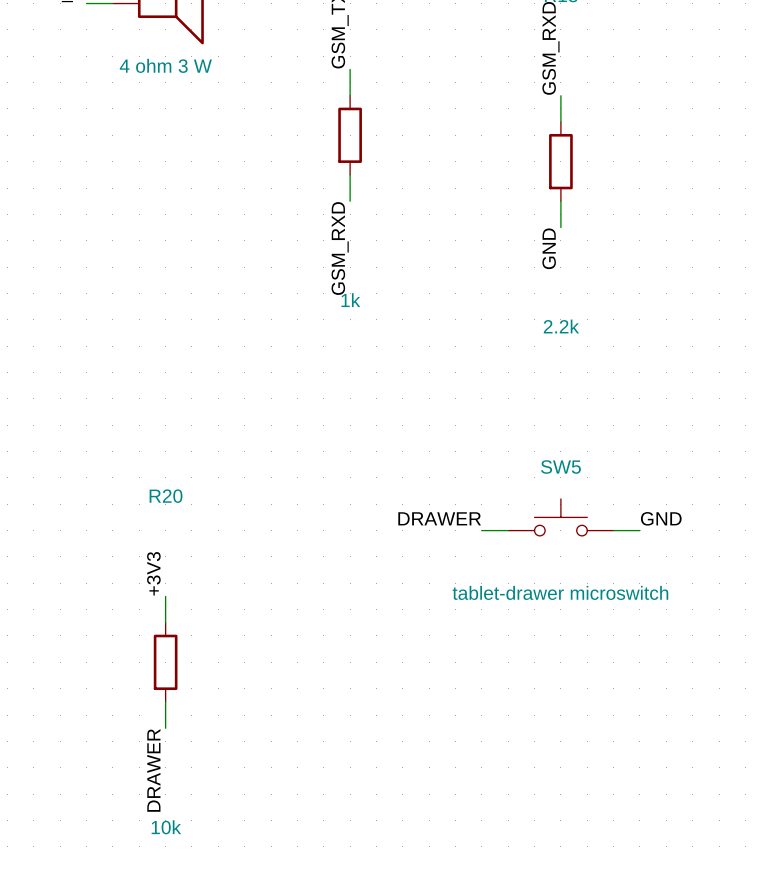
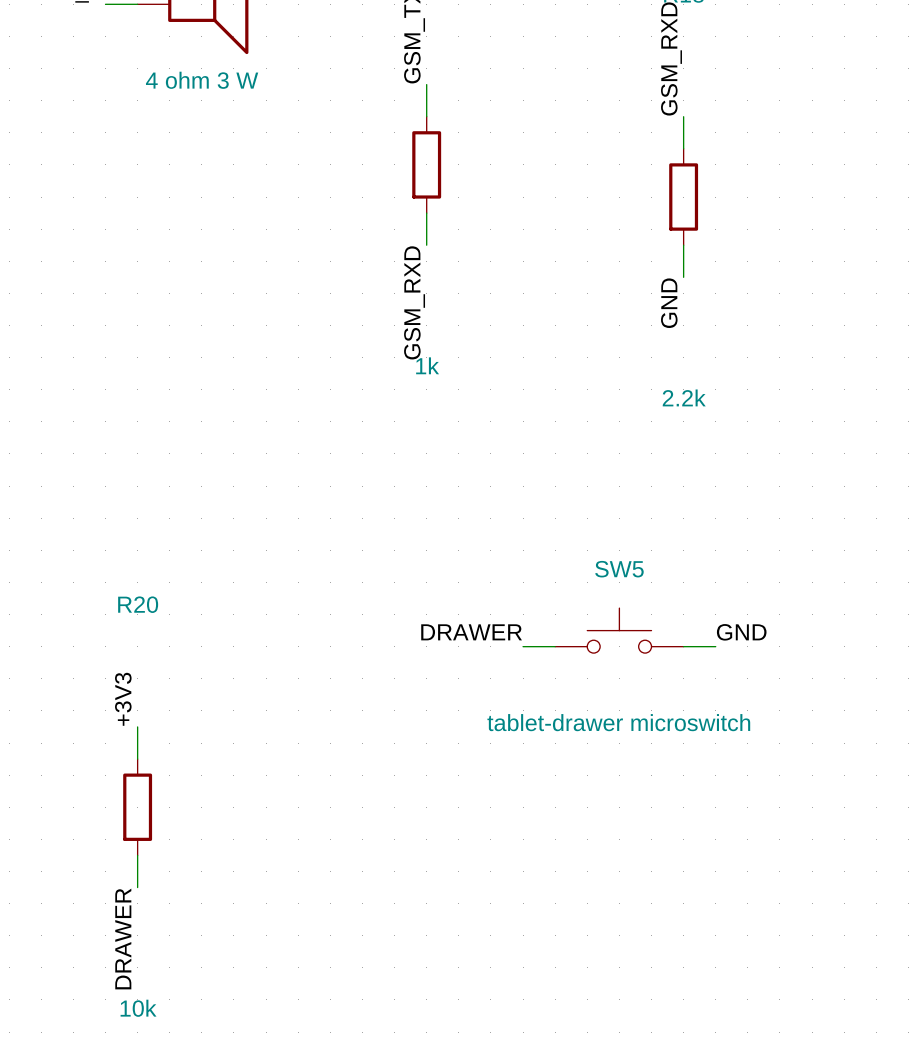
SW5 position: (560, 517) -> (619, 630)
label position: DRAWER (439, 518) -> DRAWER (471, 632)
label position: GND (661, 518) -> GND (741, 632)
wire: (481, 530) (508, 530) -> (523, 646) (555, 646)
wire: (613, 530) (639, 530) -> (683, 646) (715, 646)
label position: +3V3 (153, 573) -> +3V3 (123, 699)
wire: (165, 596) (165, 622) -> (137, 726) (137, 759)
R20 position: (165, 662) -> (137, 807)
wire: (165, 701) (165, 728) -> (137, 855) (137, 887)
label position: DRAWER (153, 770) -> DRAWER (123, 938)

